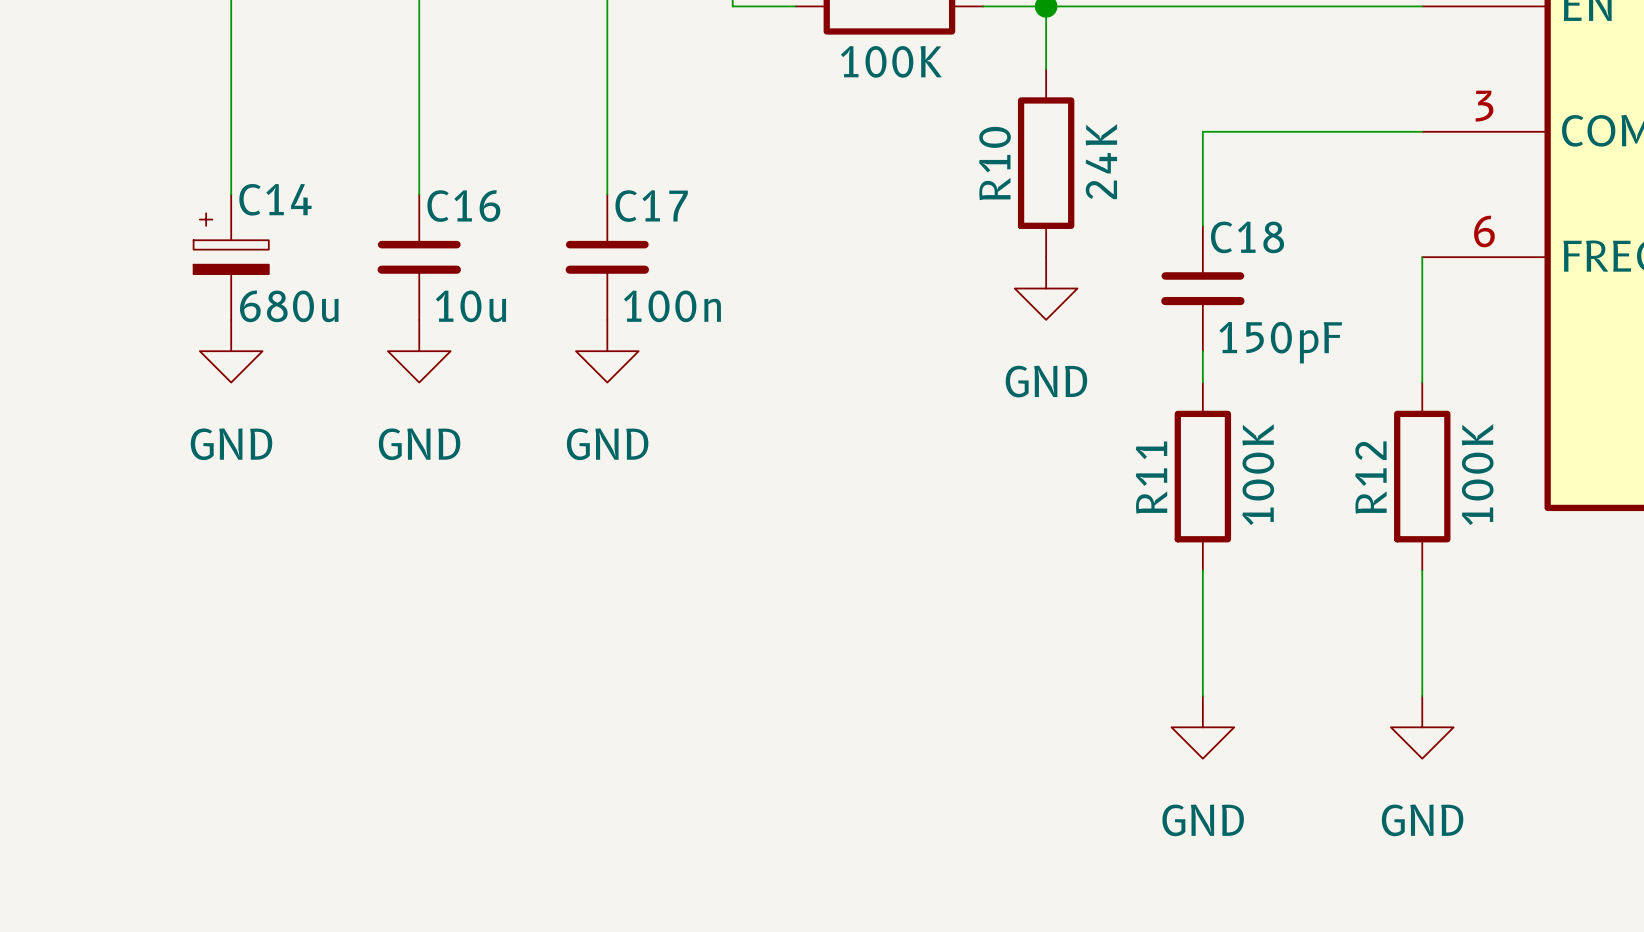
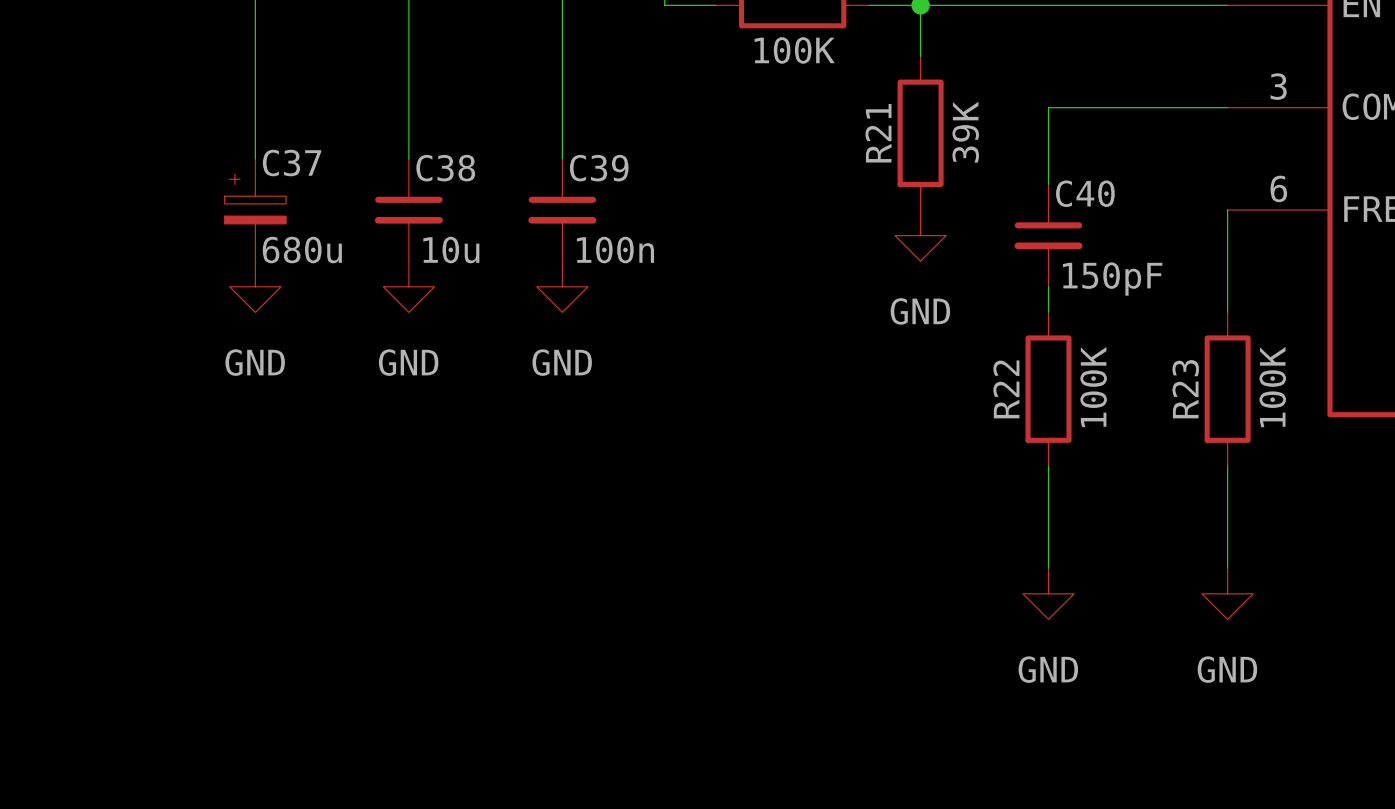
R10 value: 24K (1101, 161) -> 39K (965, 132)
R10 name: R10 (994, 163) -> R21 (878, 133)
C14 name: C14 (275, 199) -> C37 (292, 163)
C16 name: C16 (463, 206) -> C38 (445, 168)
C17 name: C17 (651, 206) -> C39 (599, 168)
C18 name: C18 (1247, 237) -> C40 (1085, 193)
R11 name: R11 (1151, 477) -> R22 (1006, 389)
R12 name: R12 (1370, 477) -> R23 (1185, 389)

